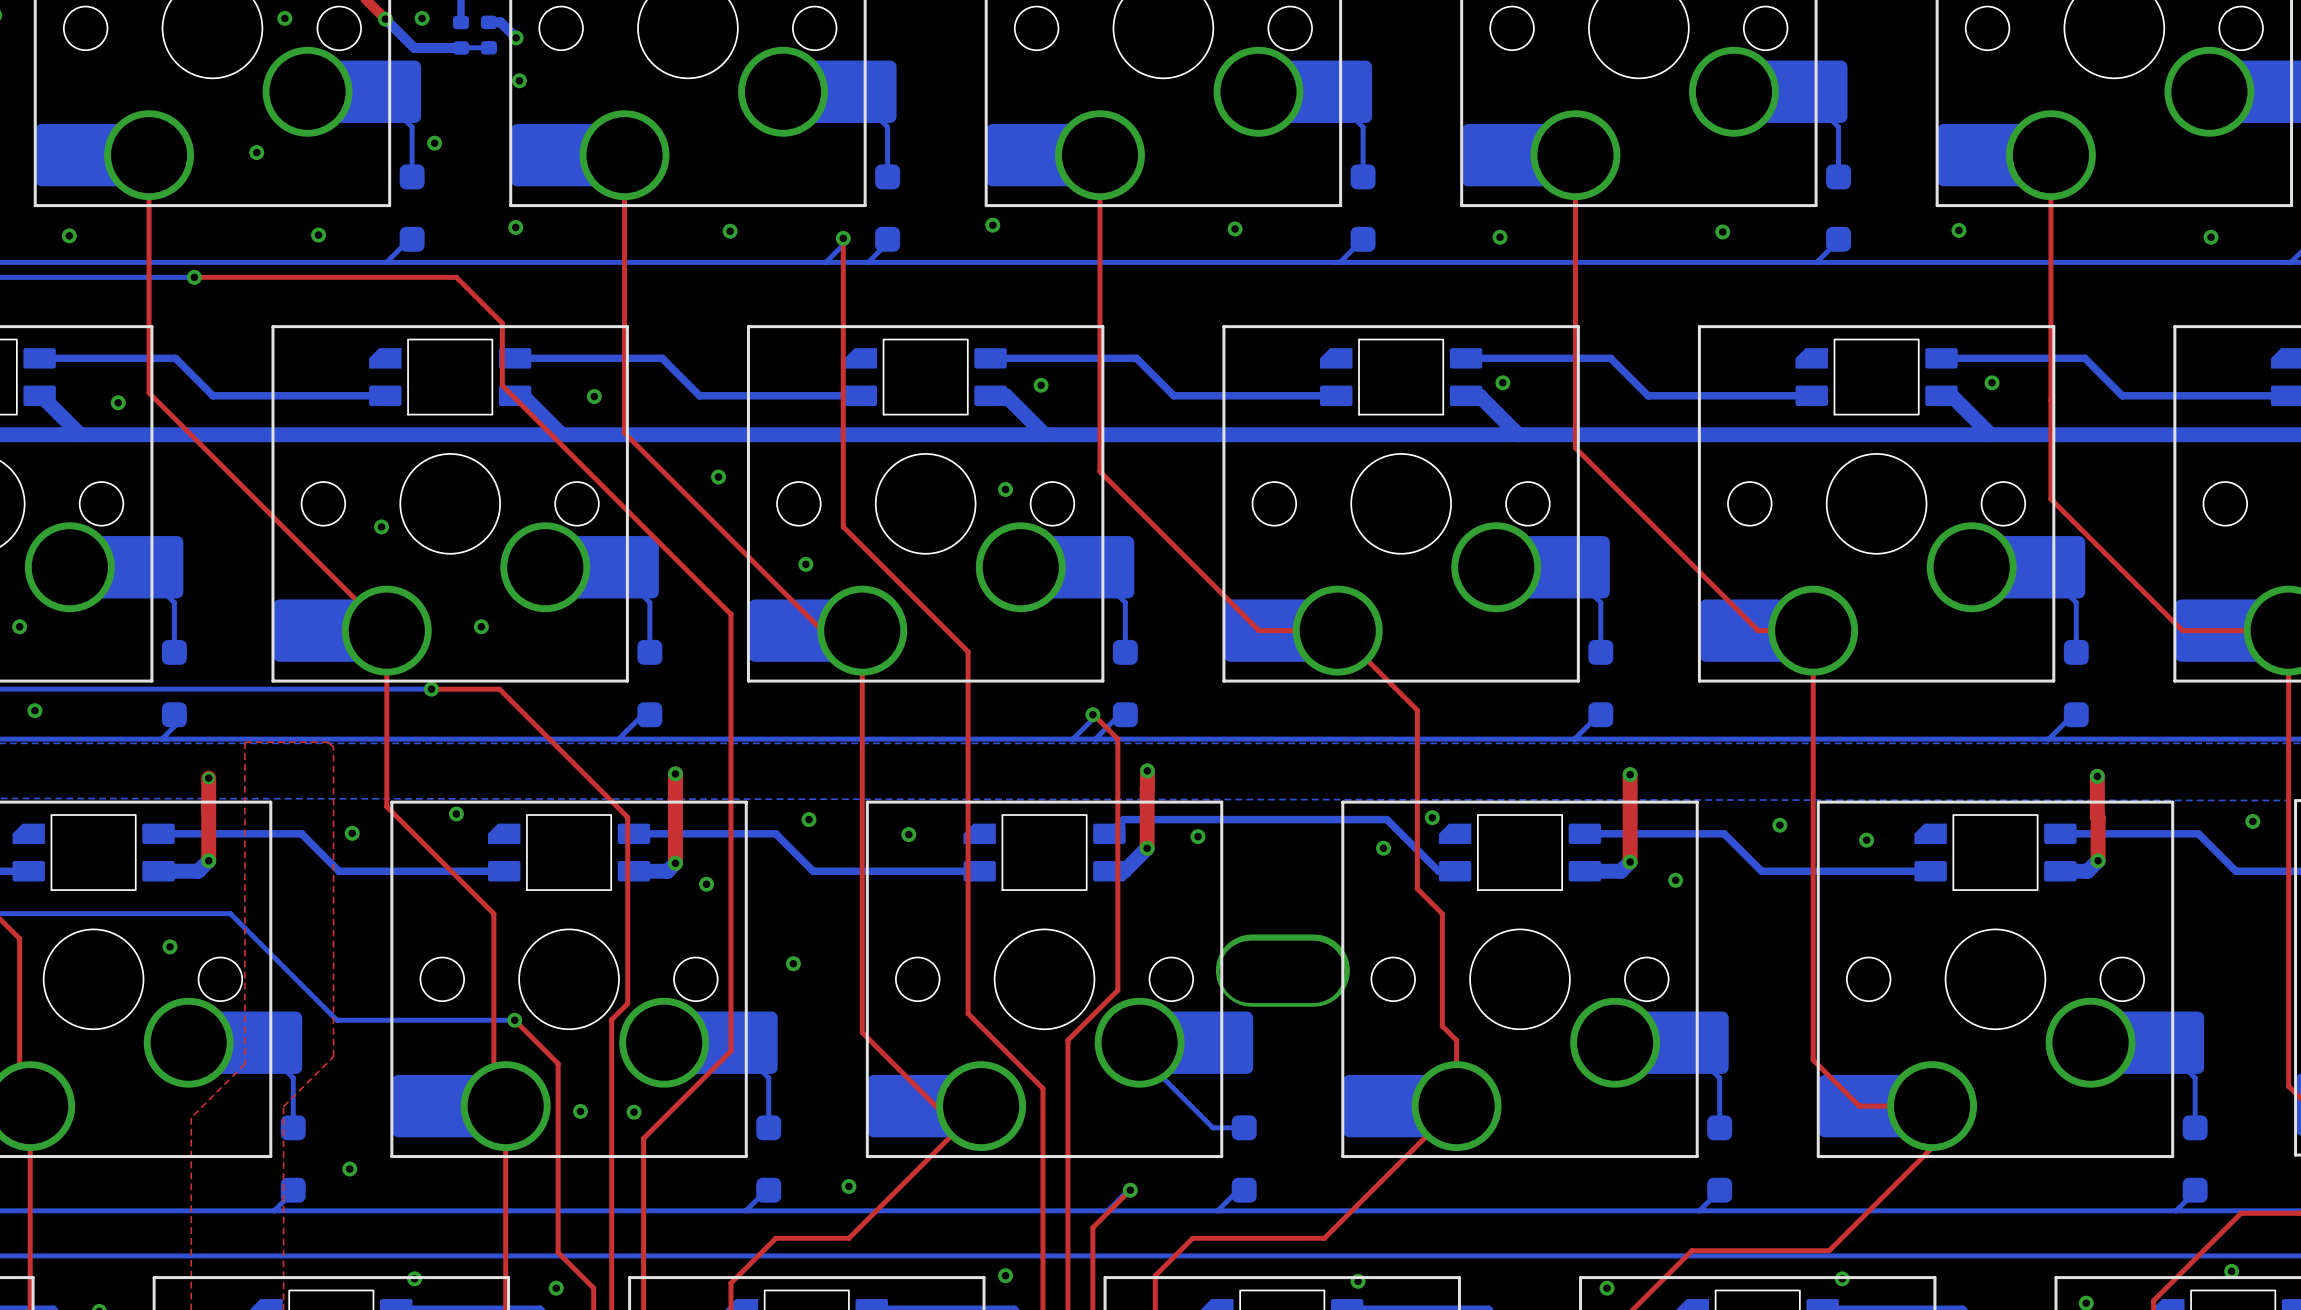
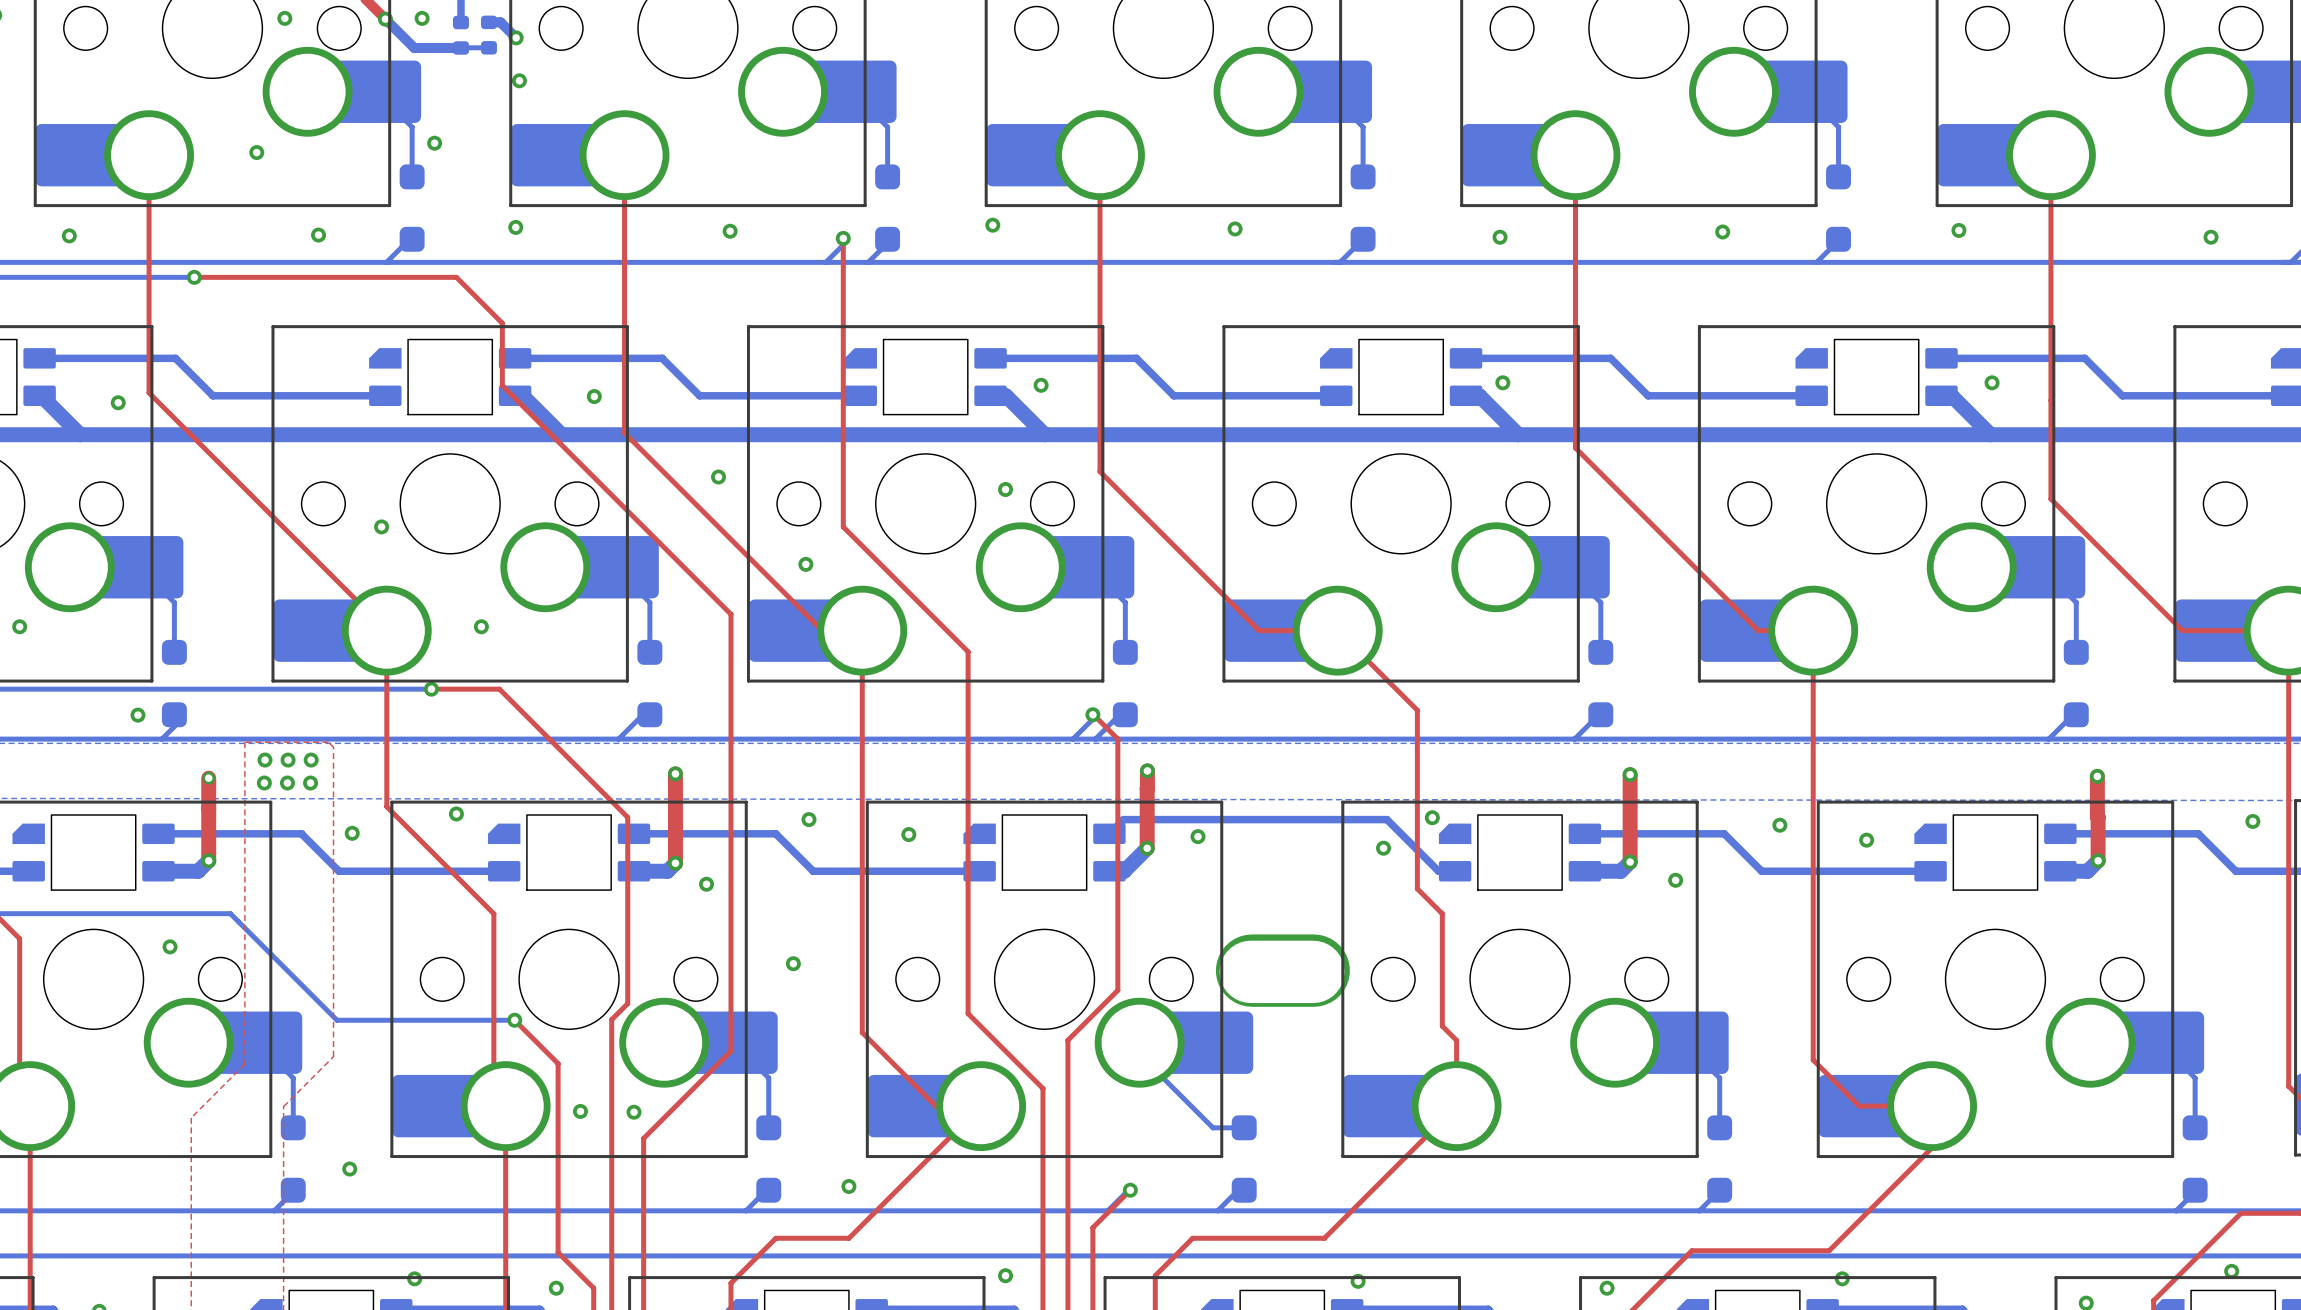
via position: (34, 710) -> (137, 715)
via: none -> (265, 760)
via: none -> (288, 760)
via: none -> (311, 760)
via: none -> (264, 783)
via: none -> (287, 783)
via: none -> (310, 783)

